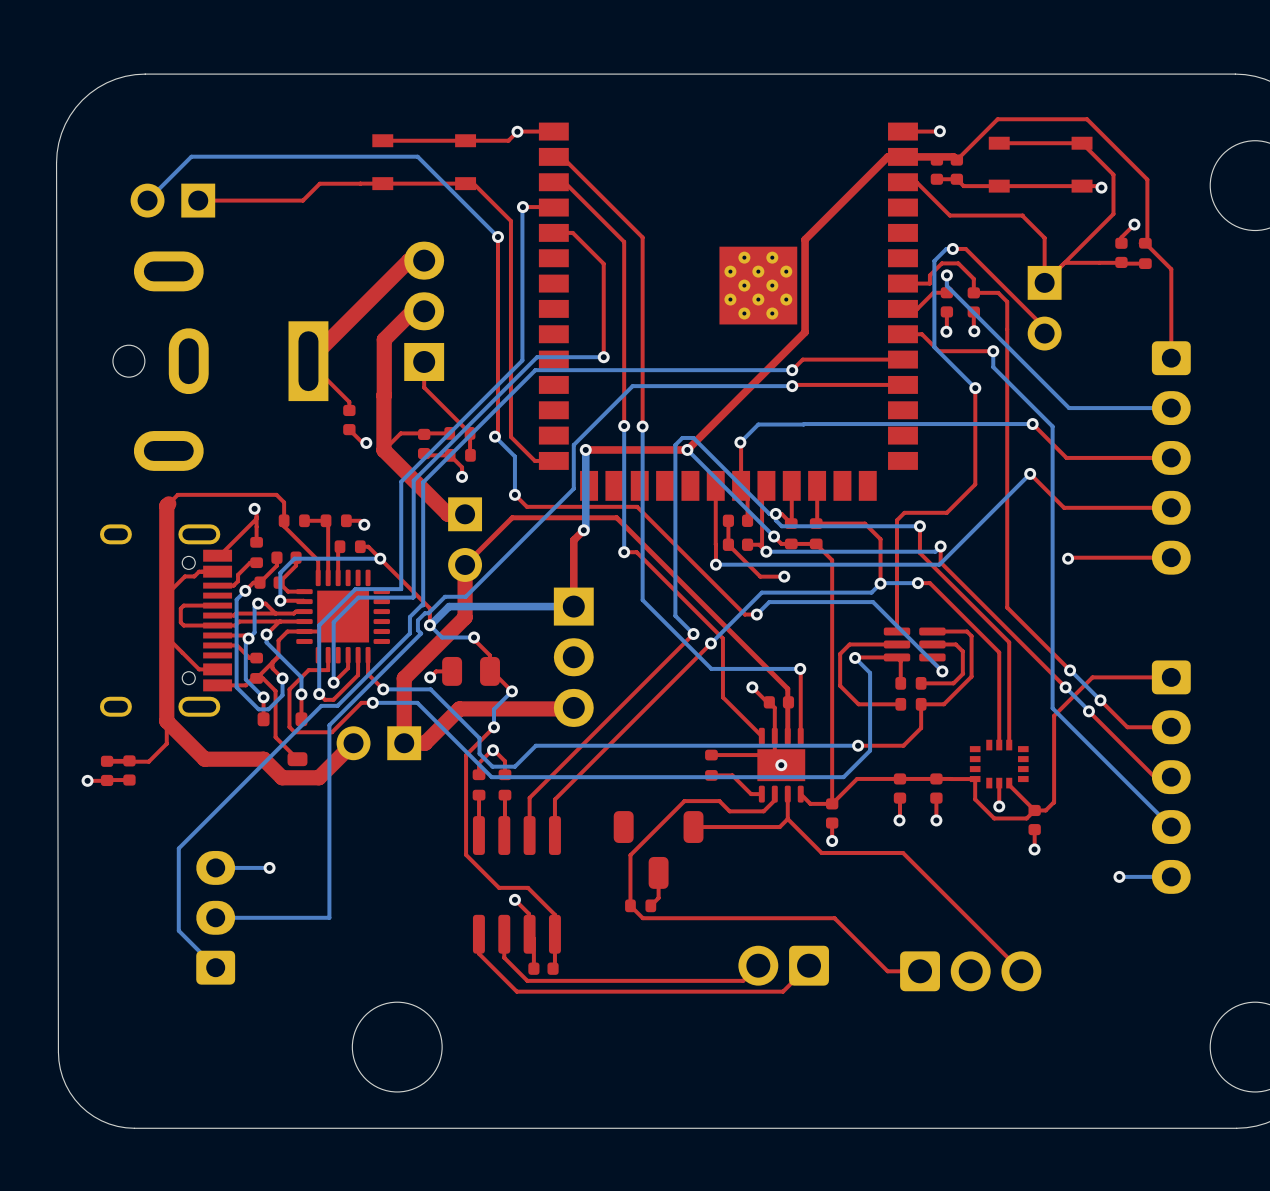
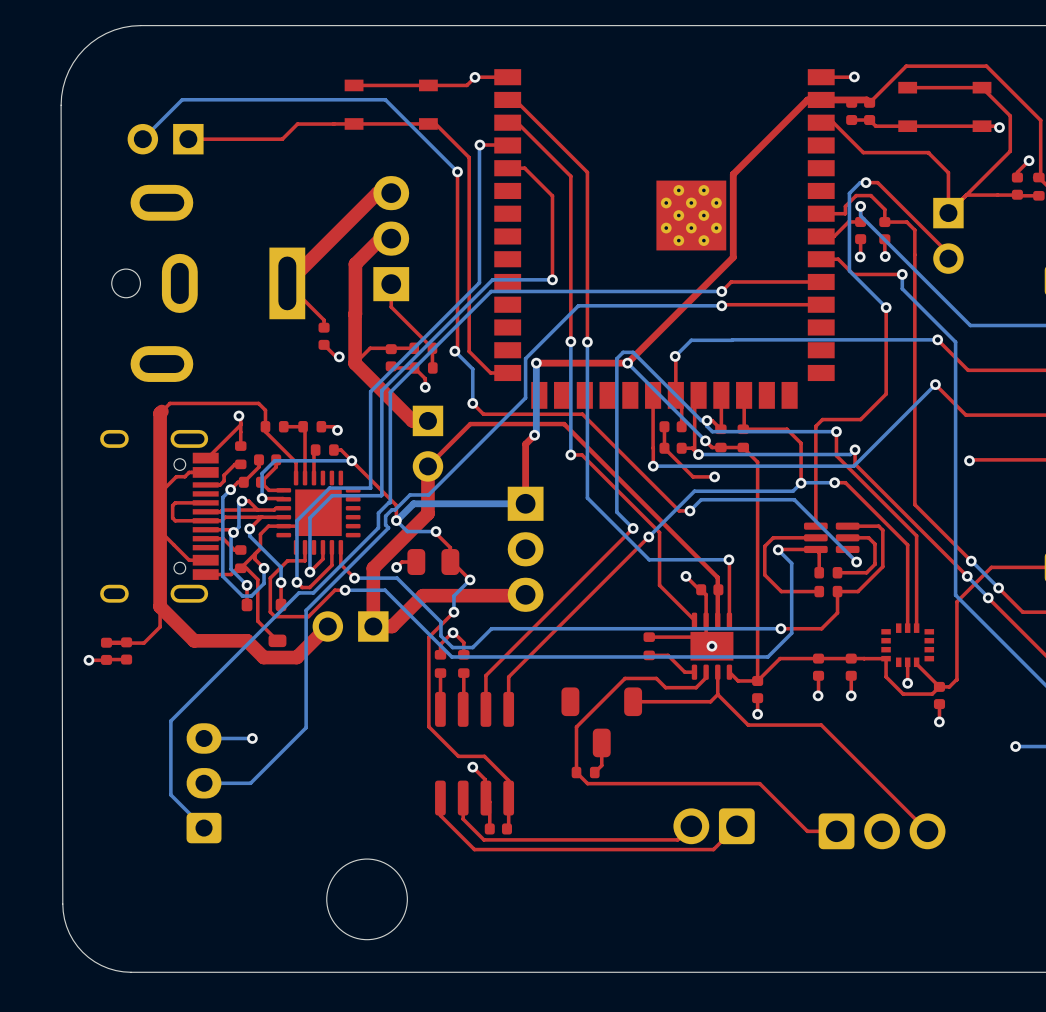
bottom track: (329, 855) (329, 917) (267, 917) -> (306, 727) (250, 783)

